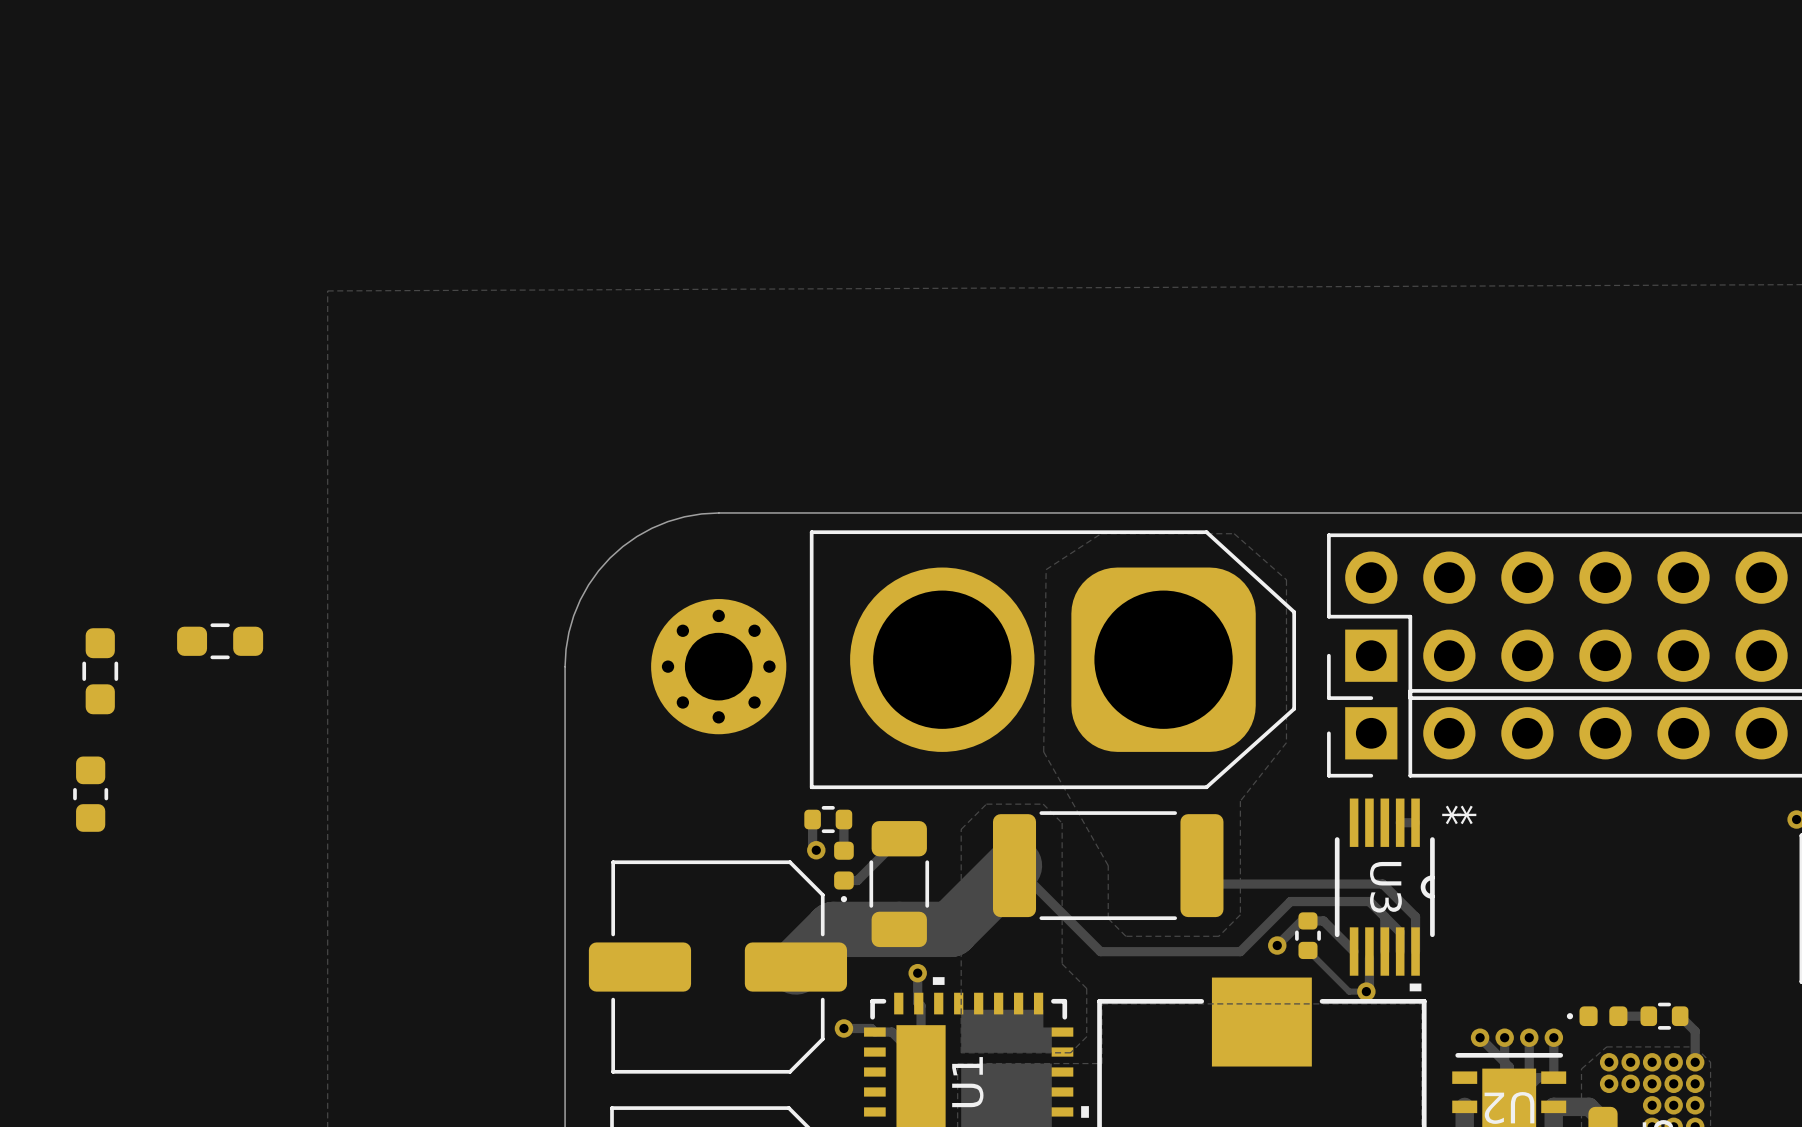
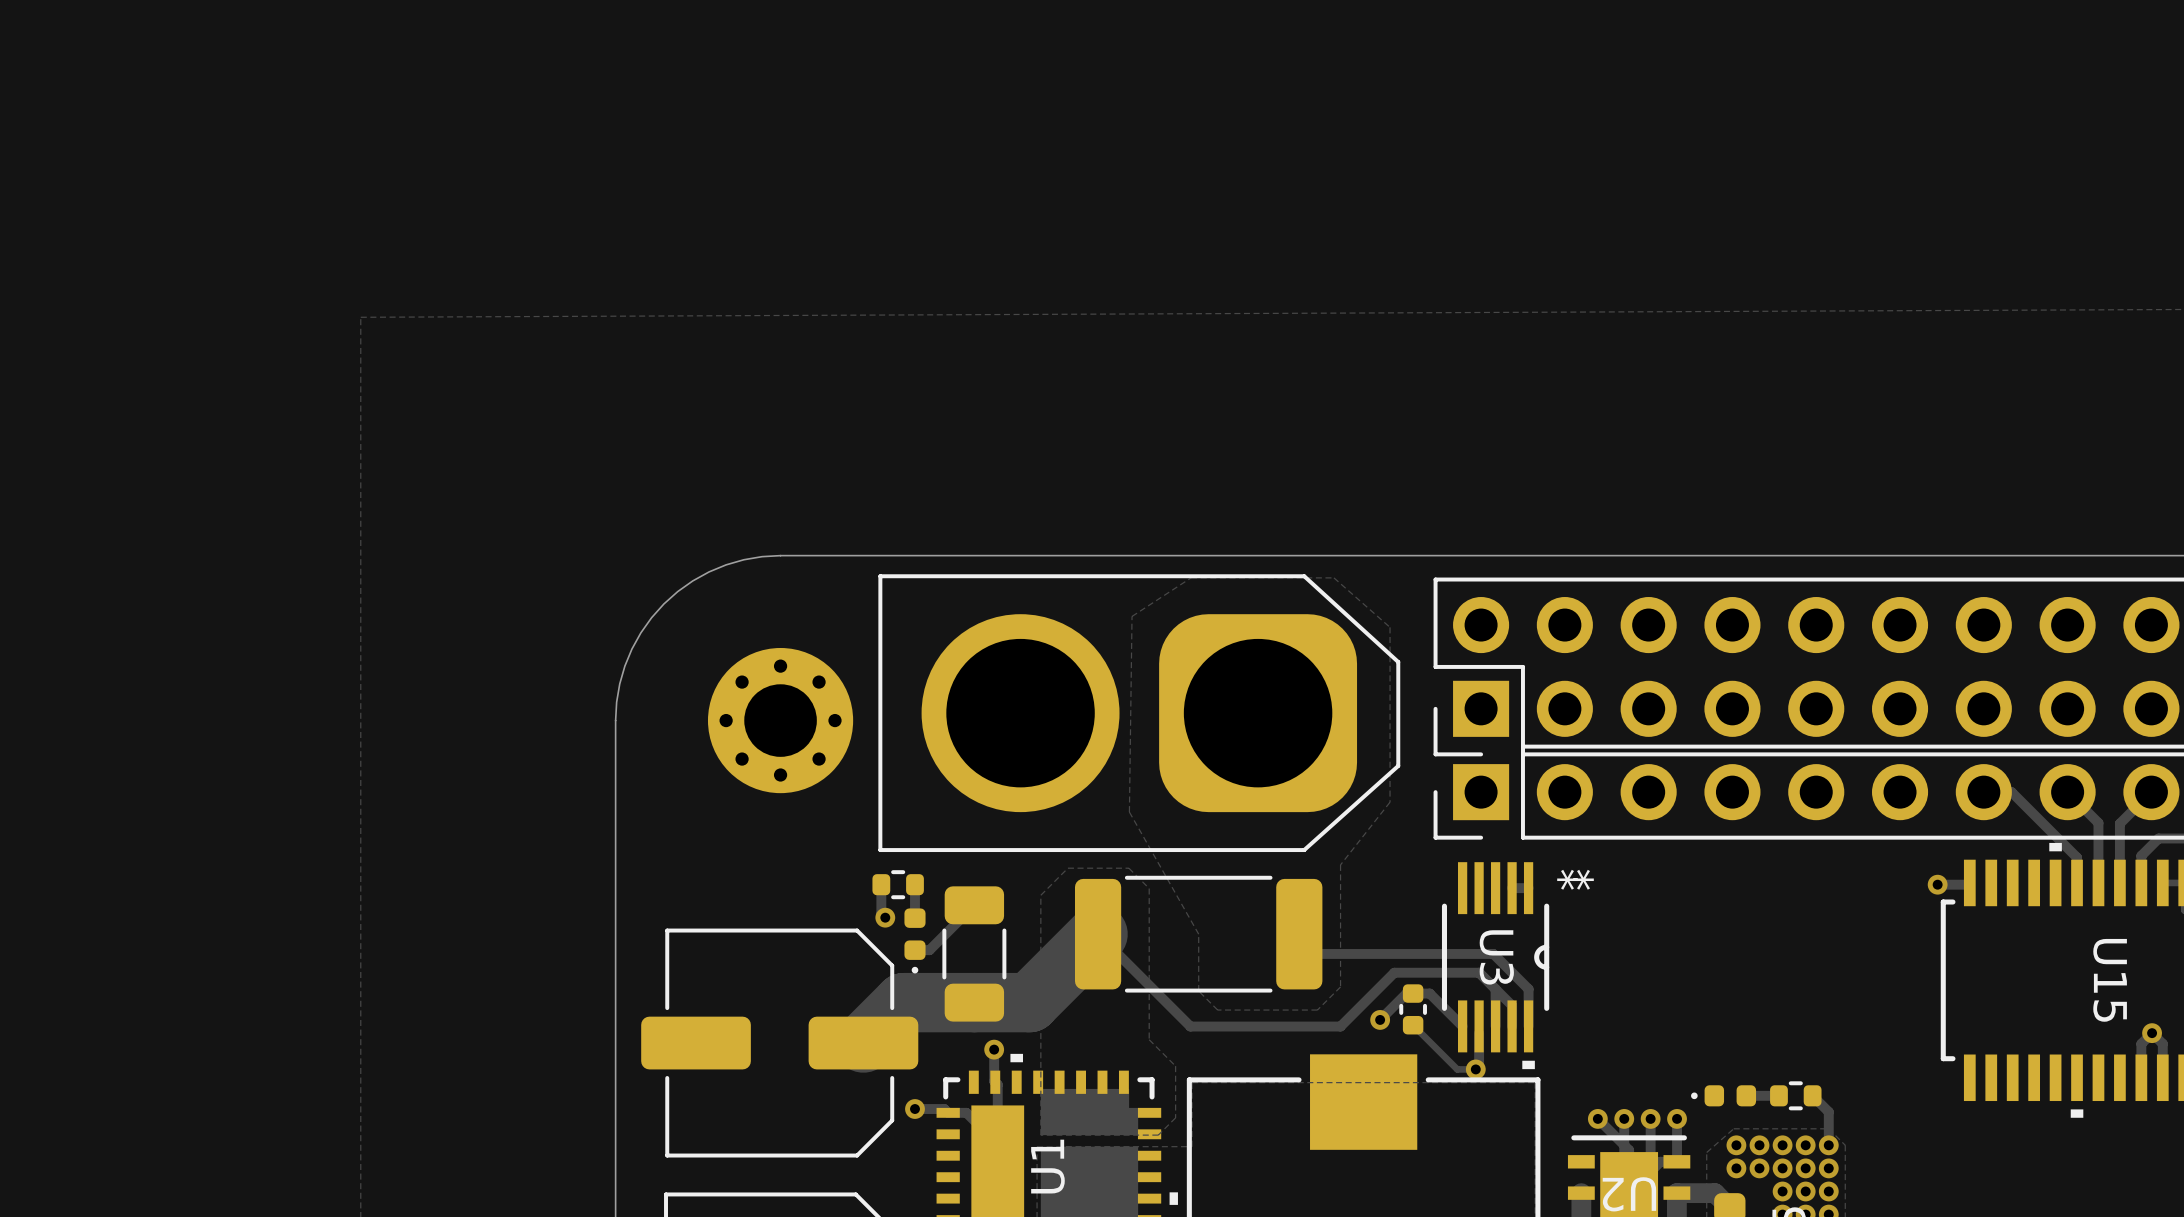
part: (220, 641) -> none
part: (100, 671) -> none
part: (90, 794) -> none

